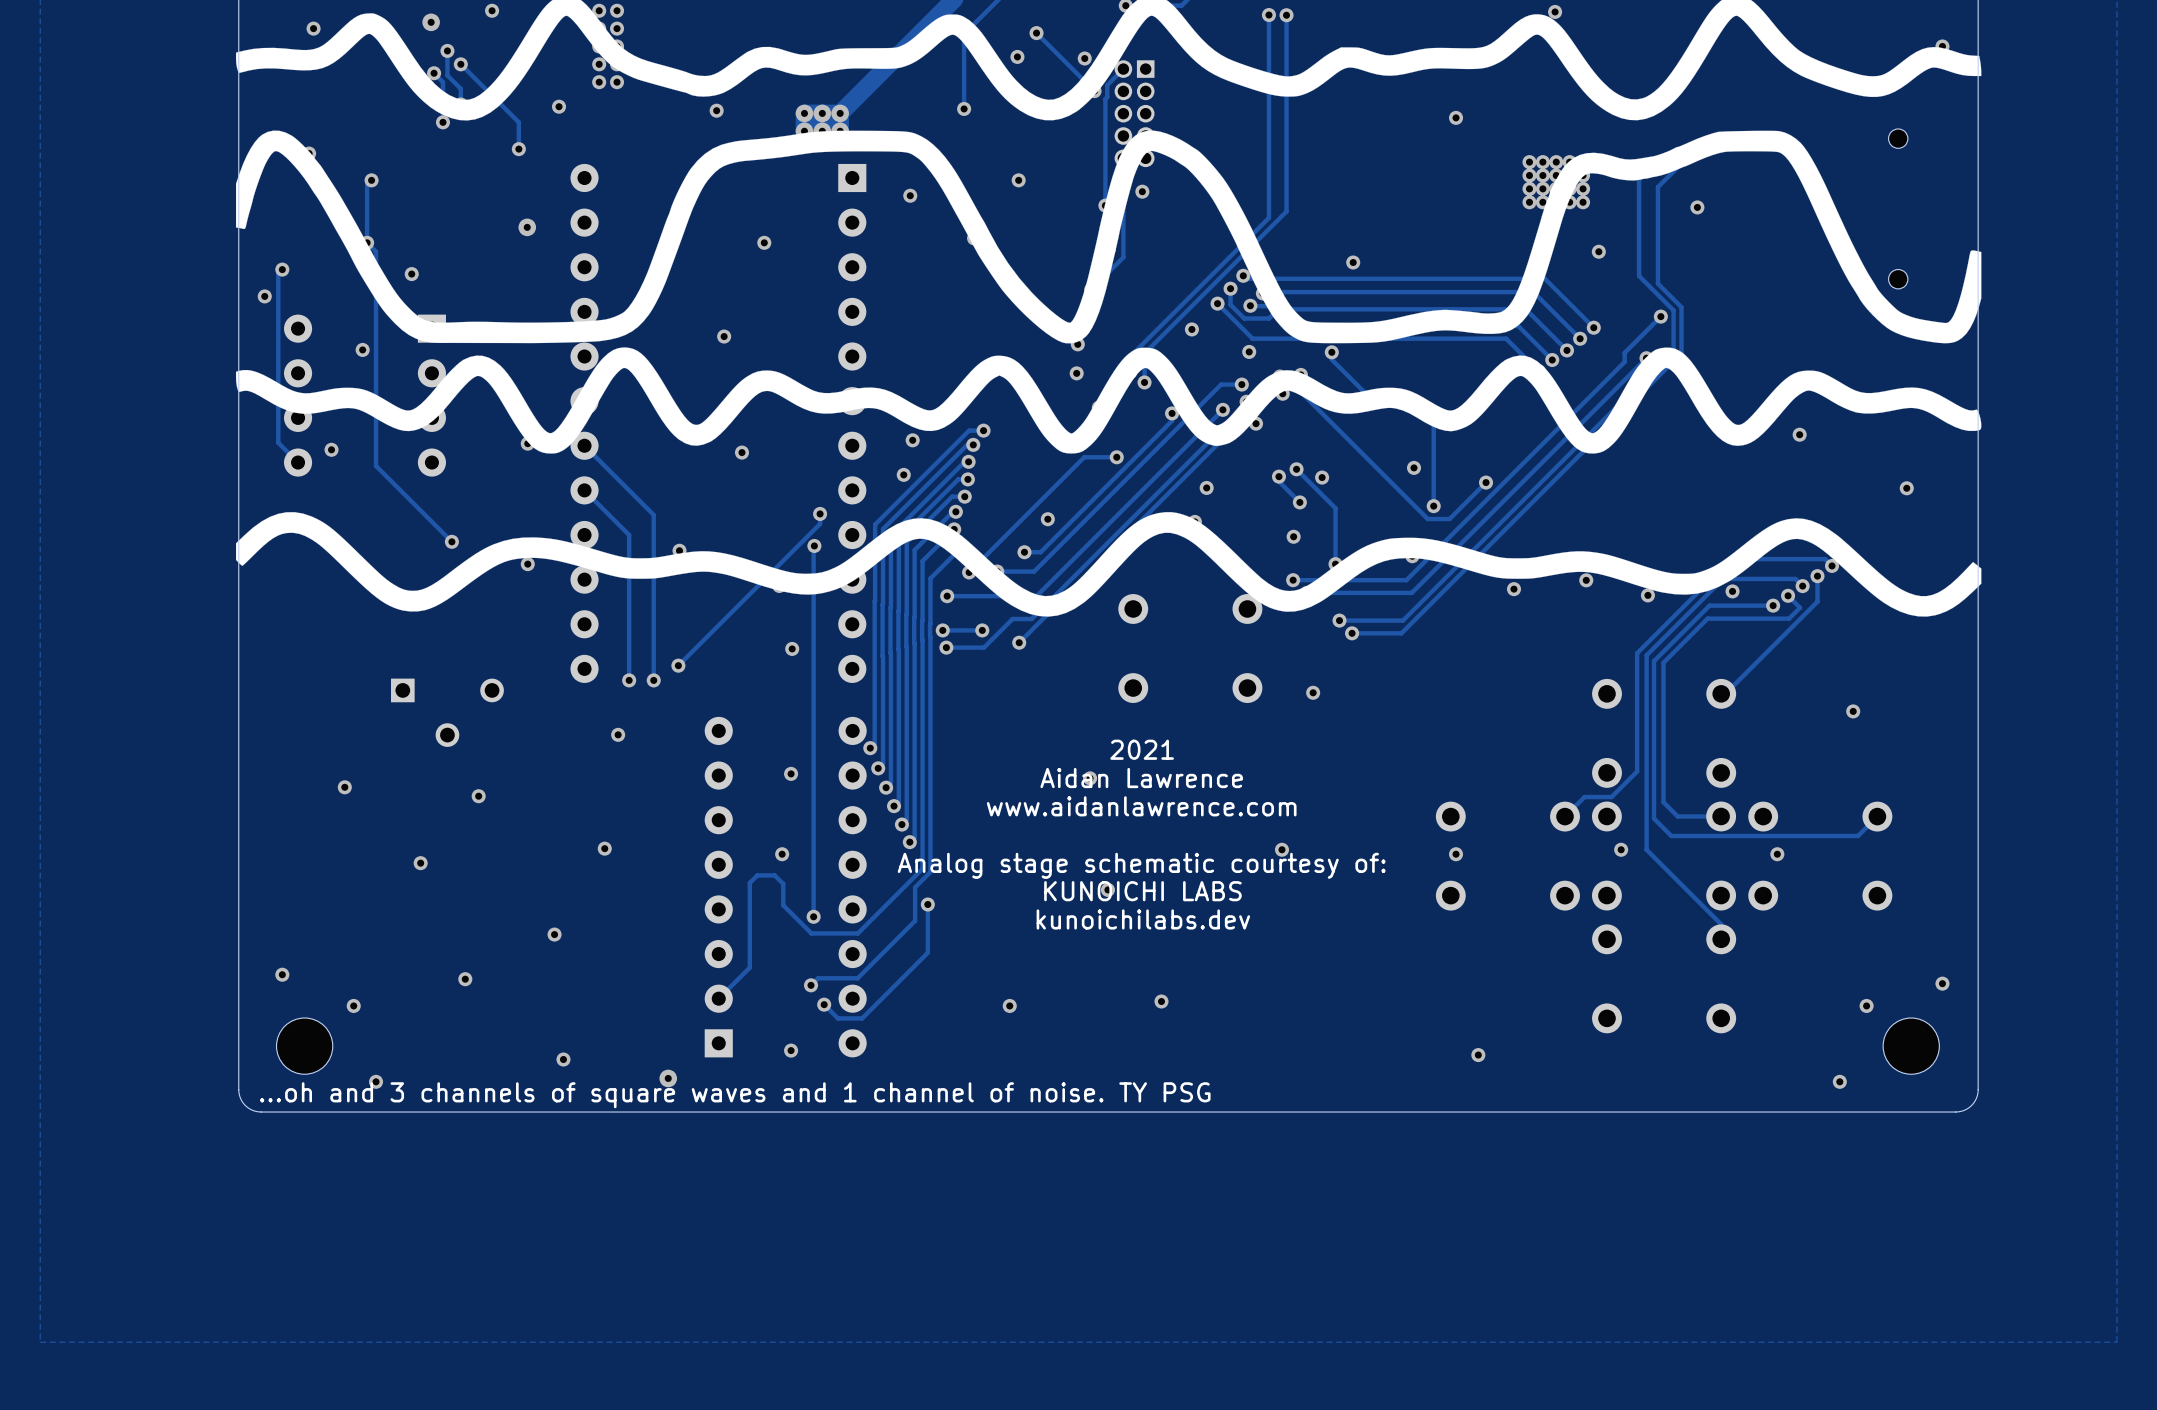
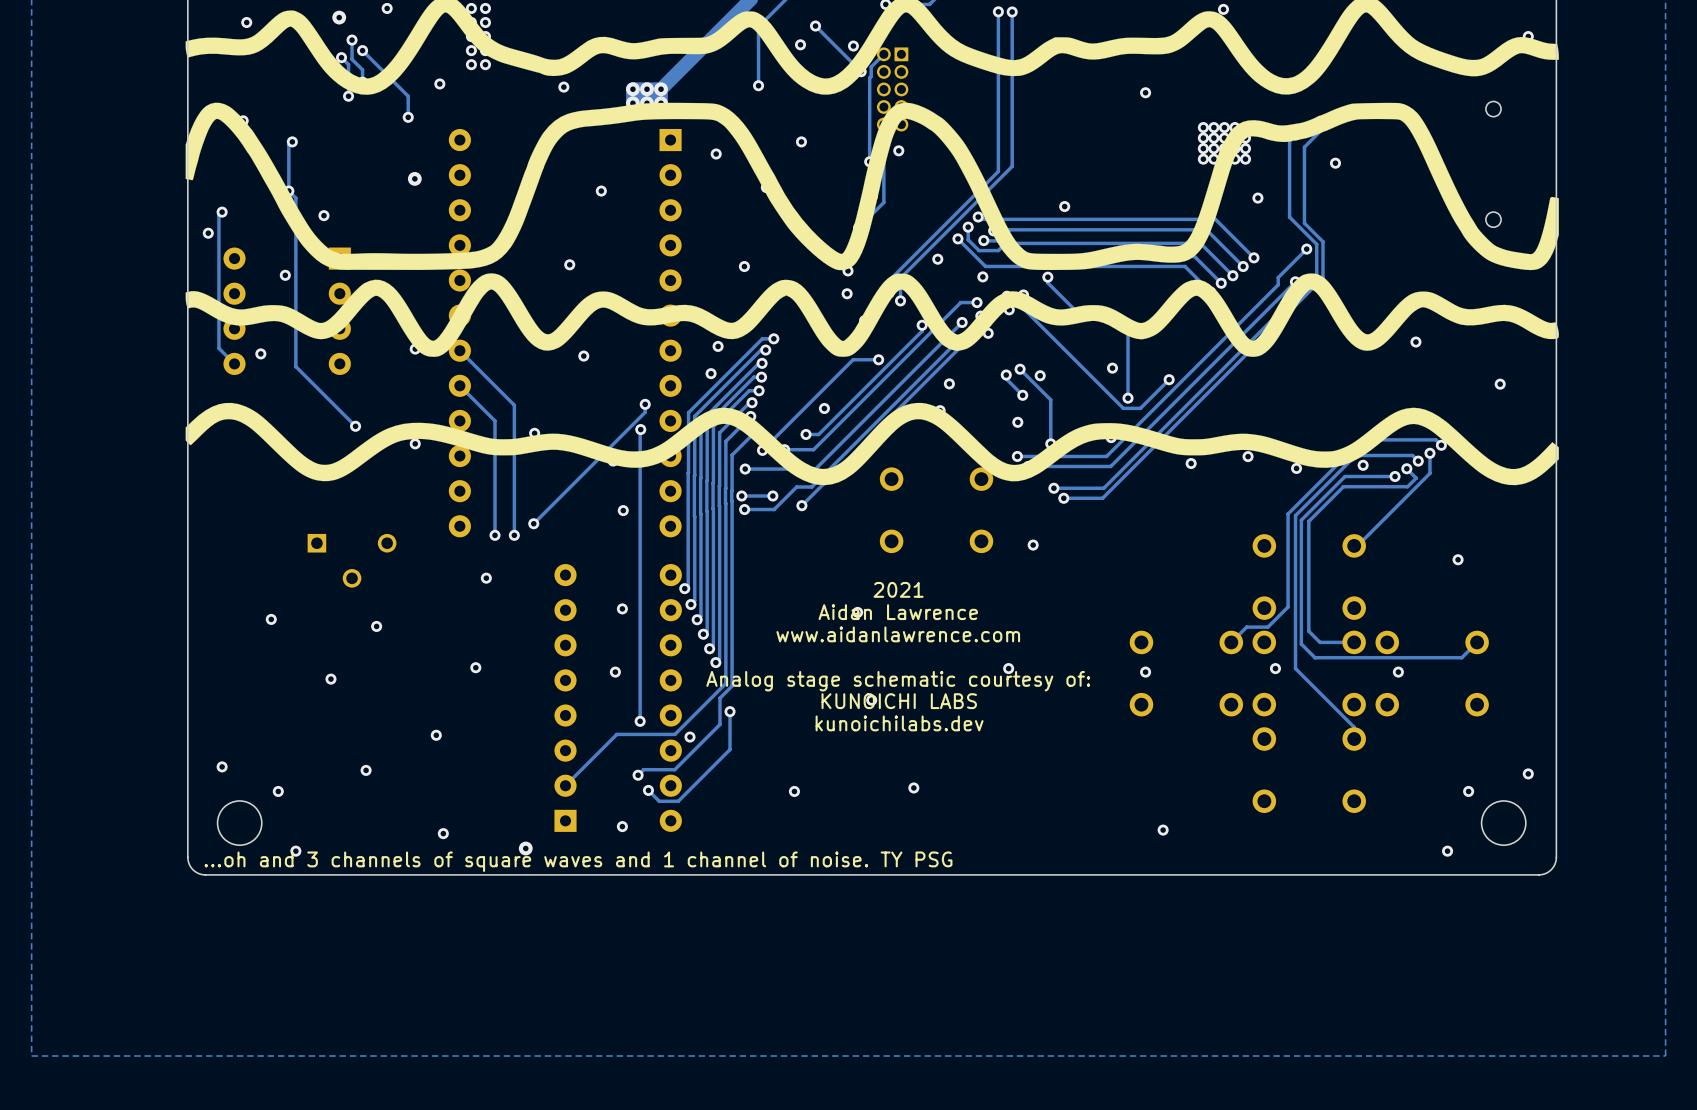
via: none -> (744, 266)
track: (811, 933) (783, 905) (783, 883) (774, 875) (757, 875) (749, 882) (749, 967) -> (638, 734) (616, 734) (589, 761)
via: none -> (689, 737)

